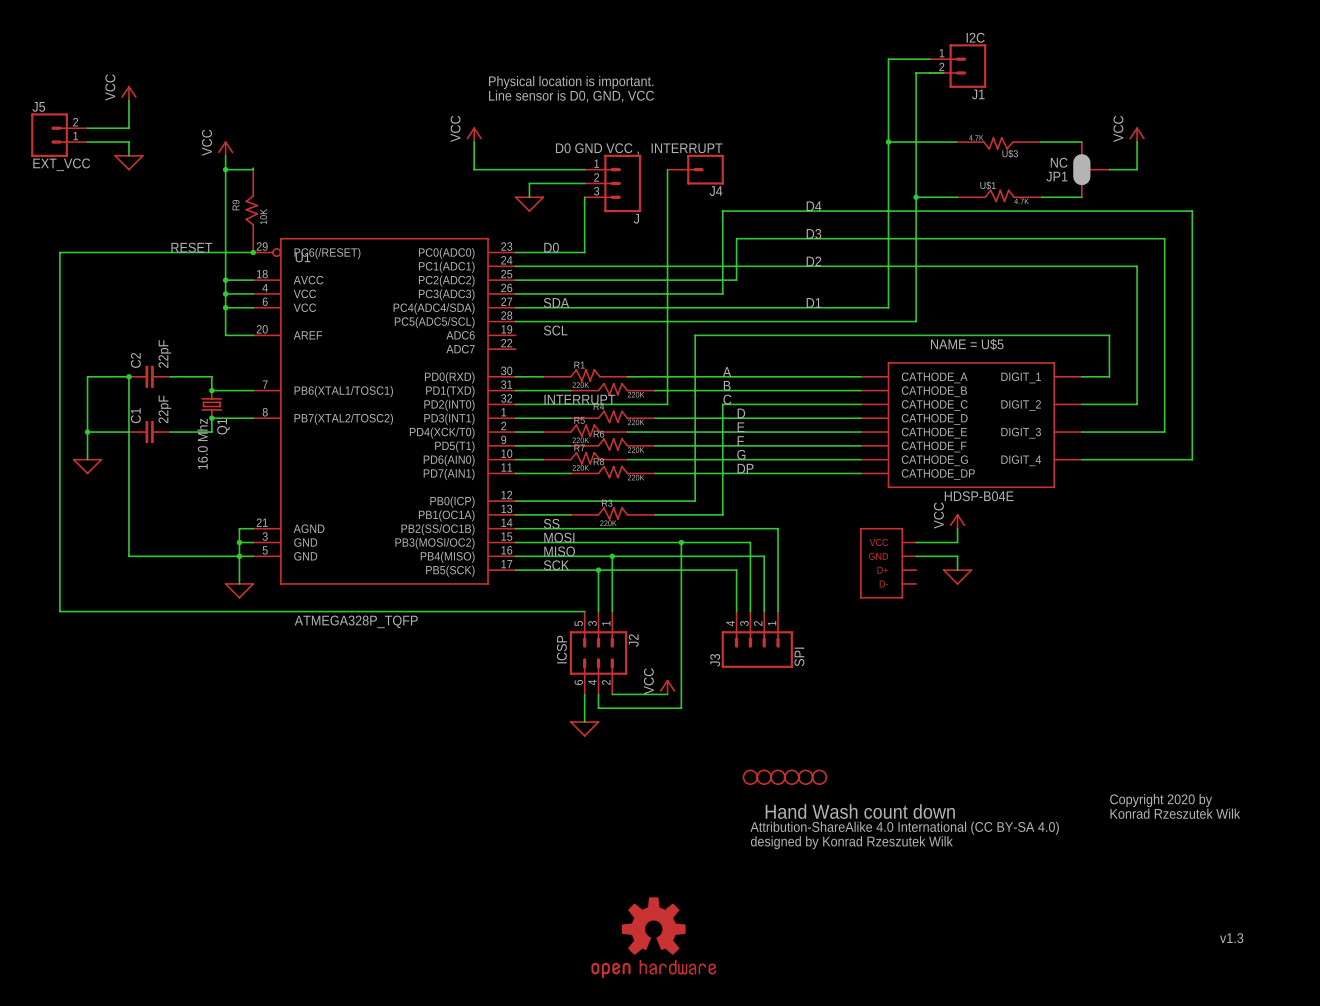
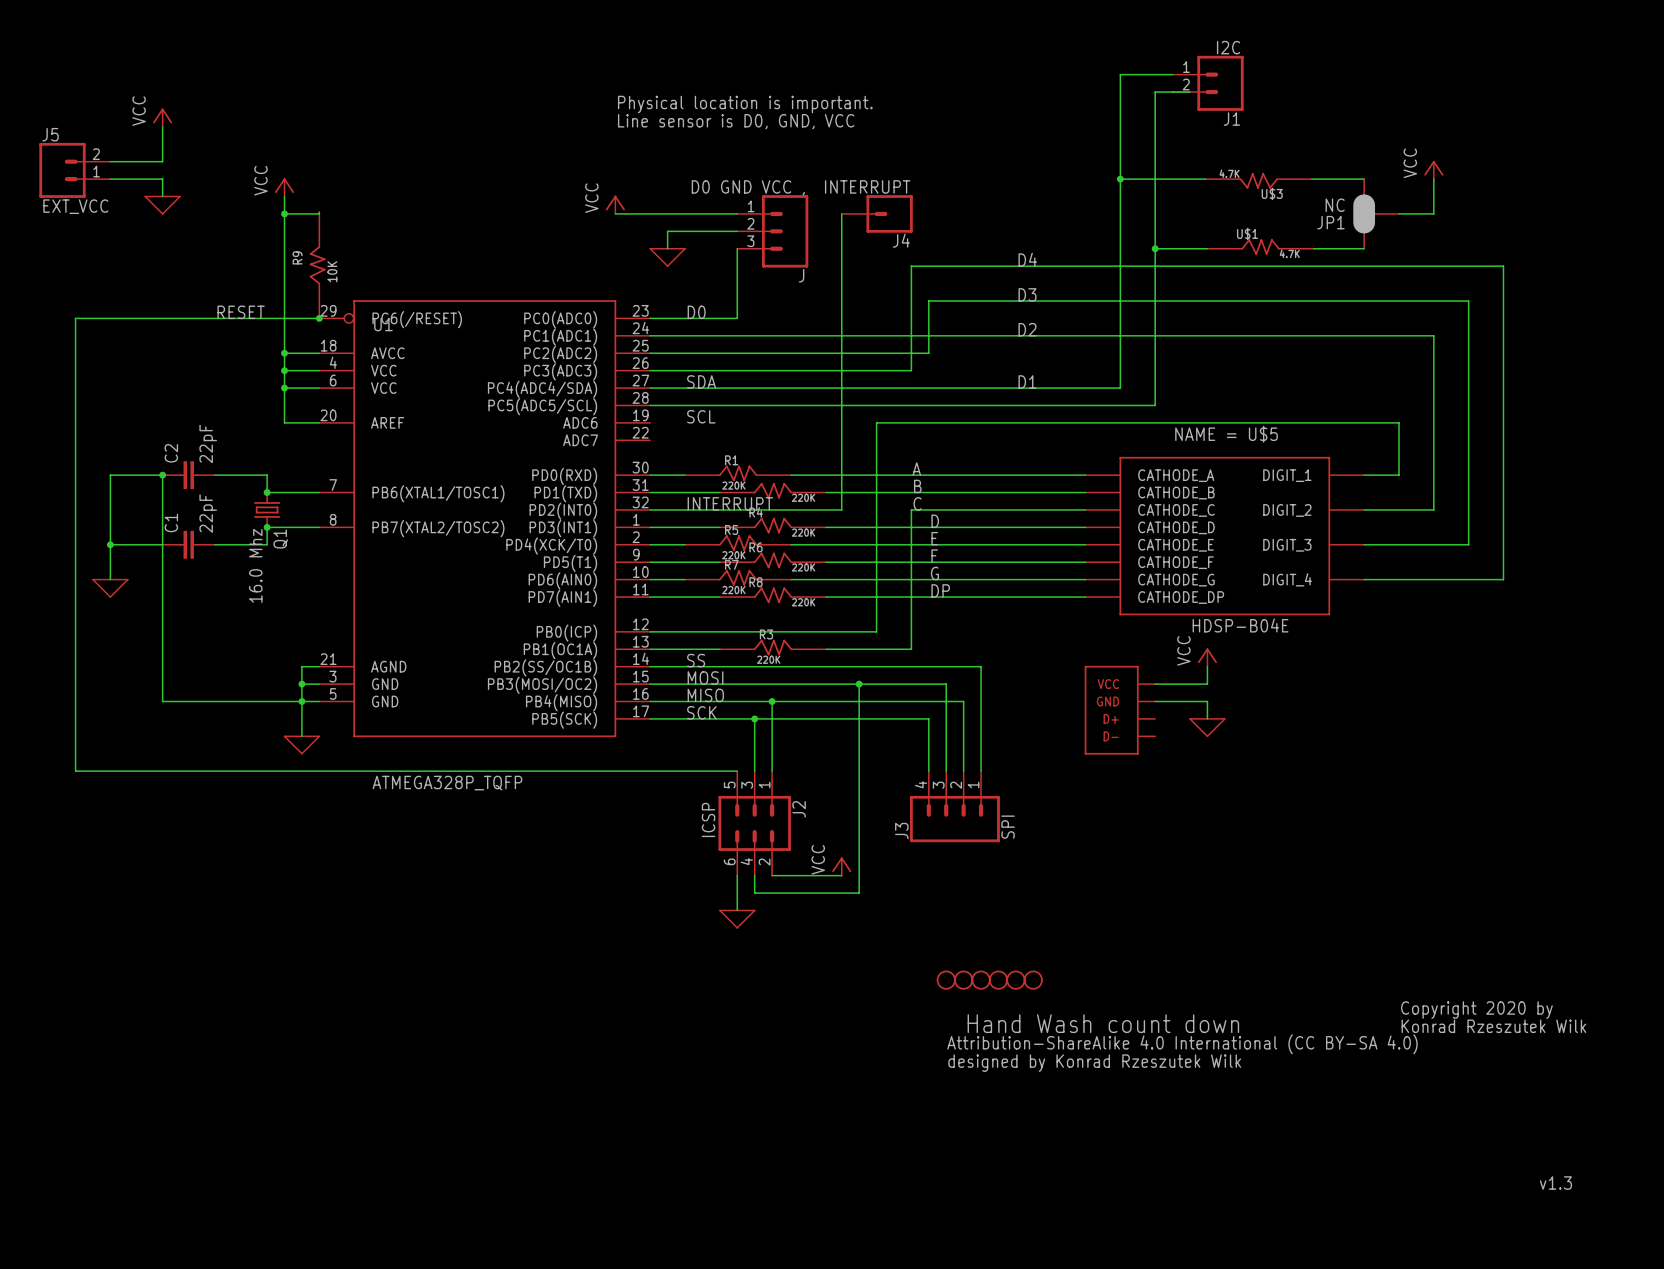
power symbol position: VCC (474, 134) -> VCC (615, 204)
wire: (474, 142) (474, 169) (488, 169) -> none
part: (653, 937) -> none

